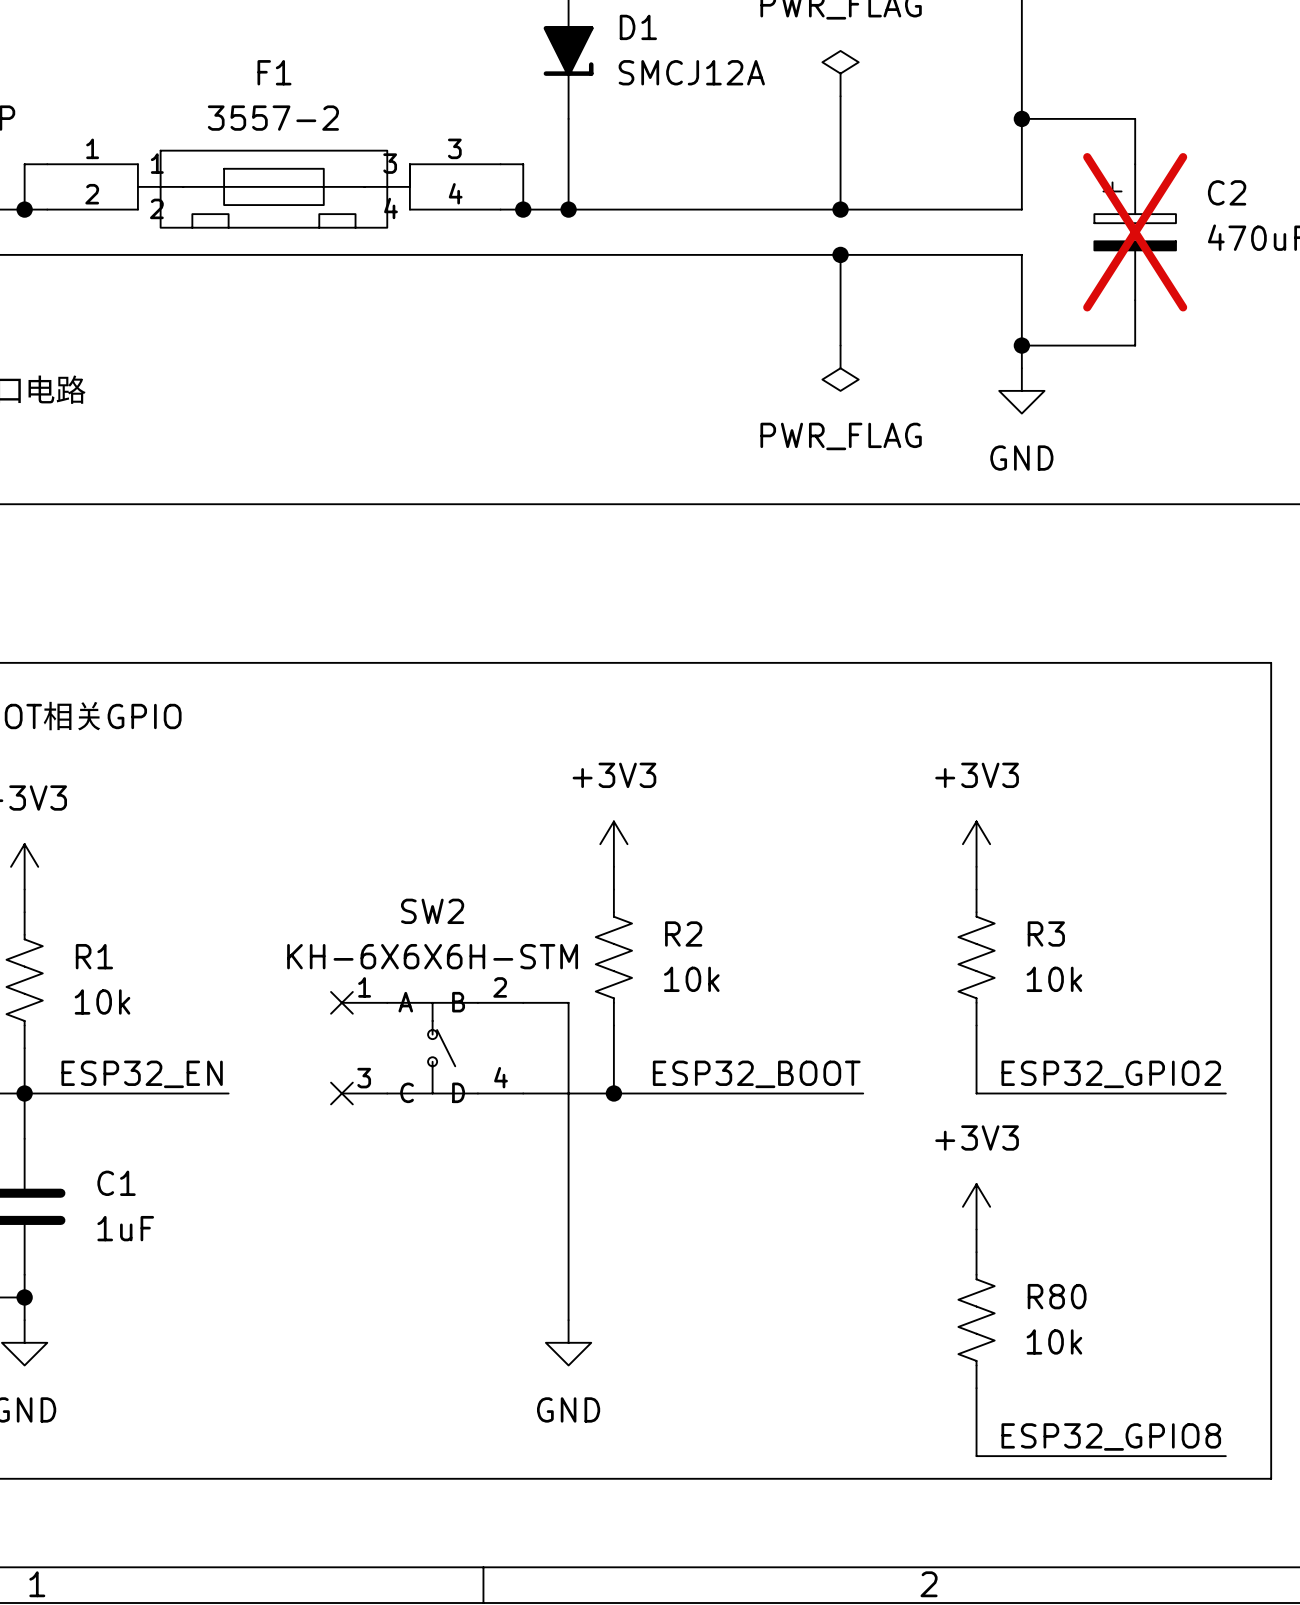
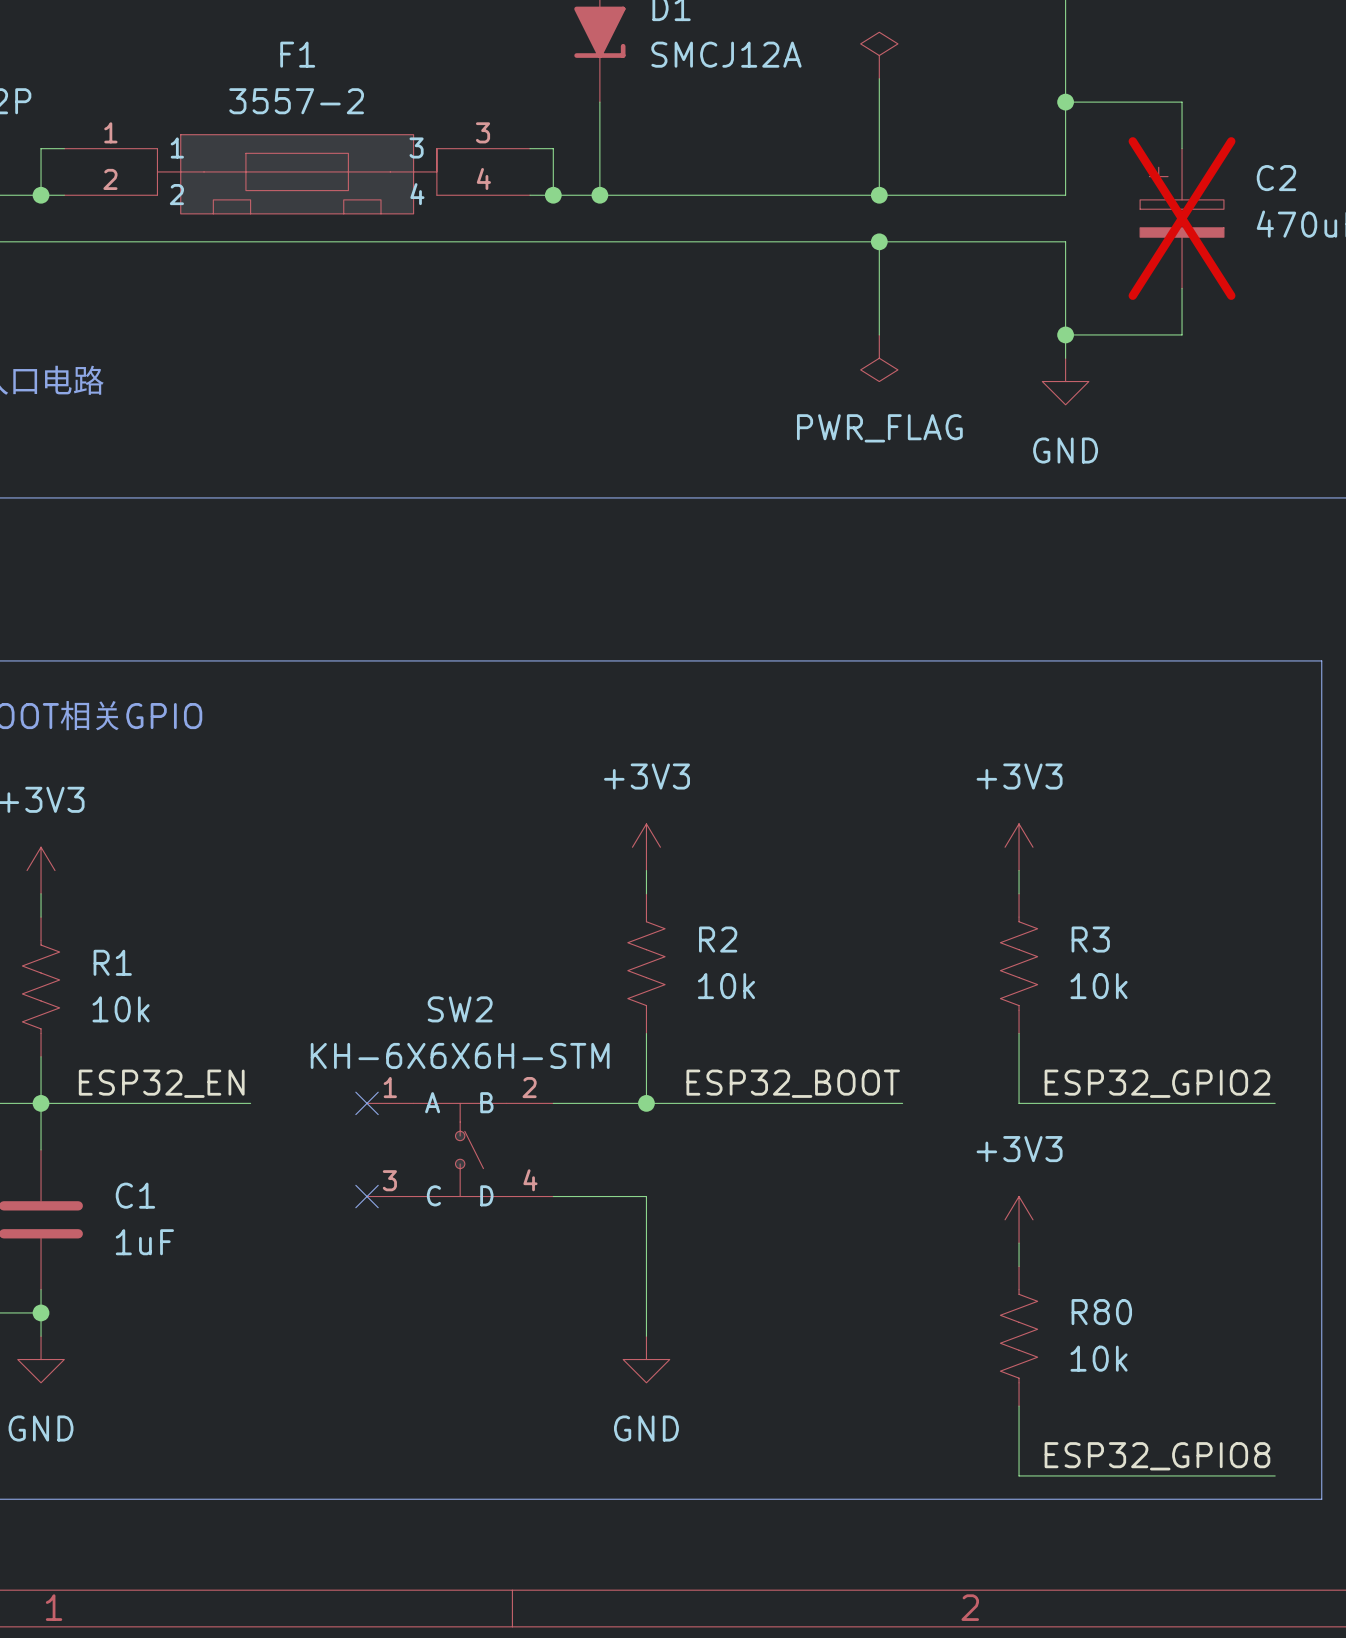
no-connect mark: (341, 1002) -> none
wire: (523, 1002) (568, 1002) (568, 1320) -> none
SW2 position: (432, 1048) -> (460, 1149)
no-connect mark: none -> (367, 1196)
wire: none -> (553, 1196) (646, 1196) (646, 1336)
power symbol position: GND (568, 1342) -> GND (646, 1359)

